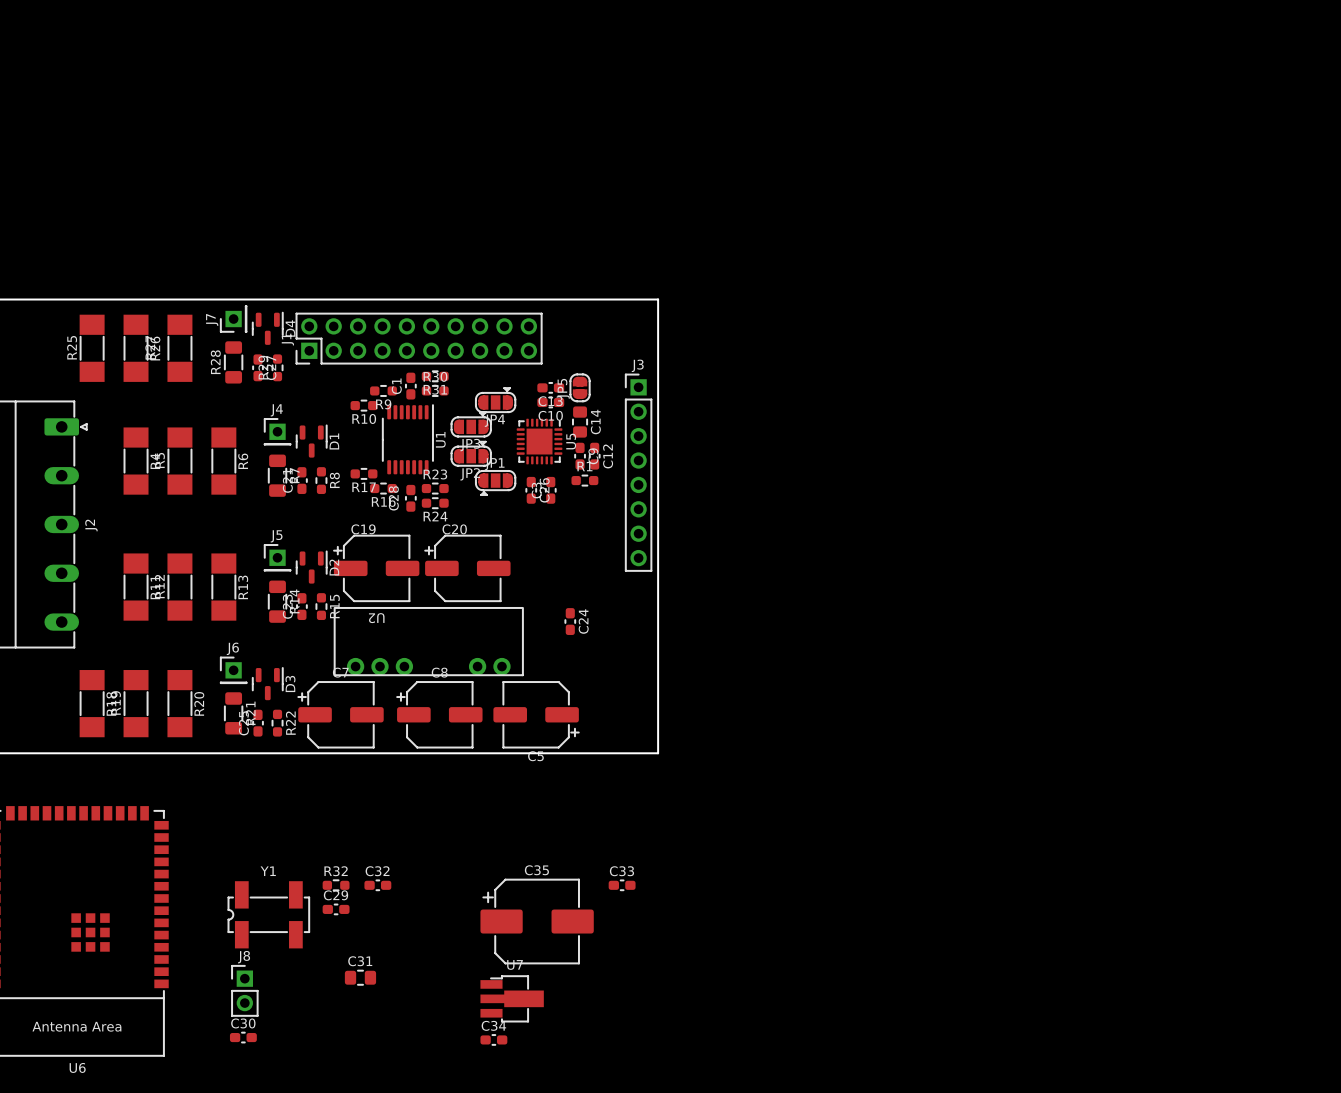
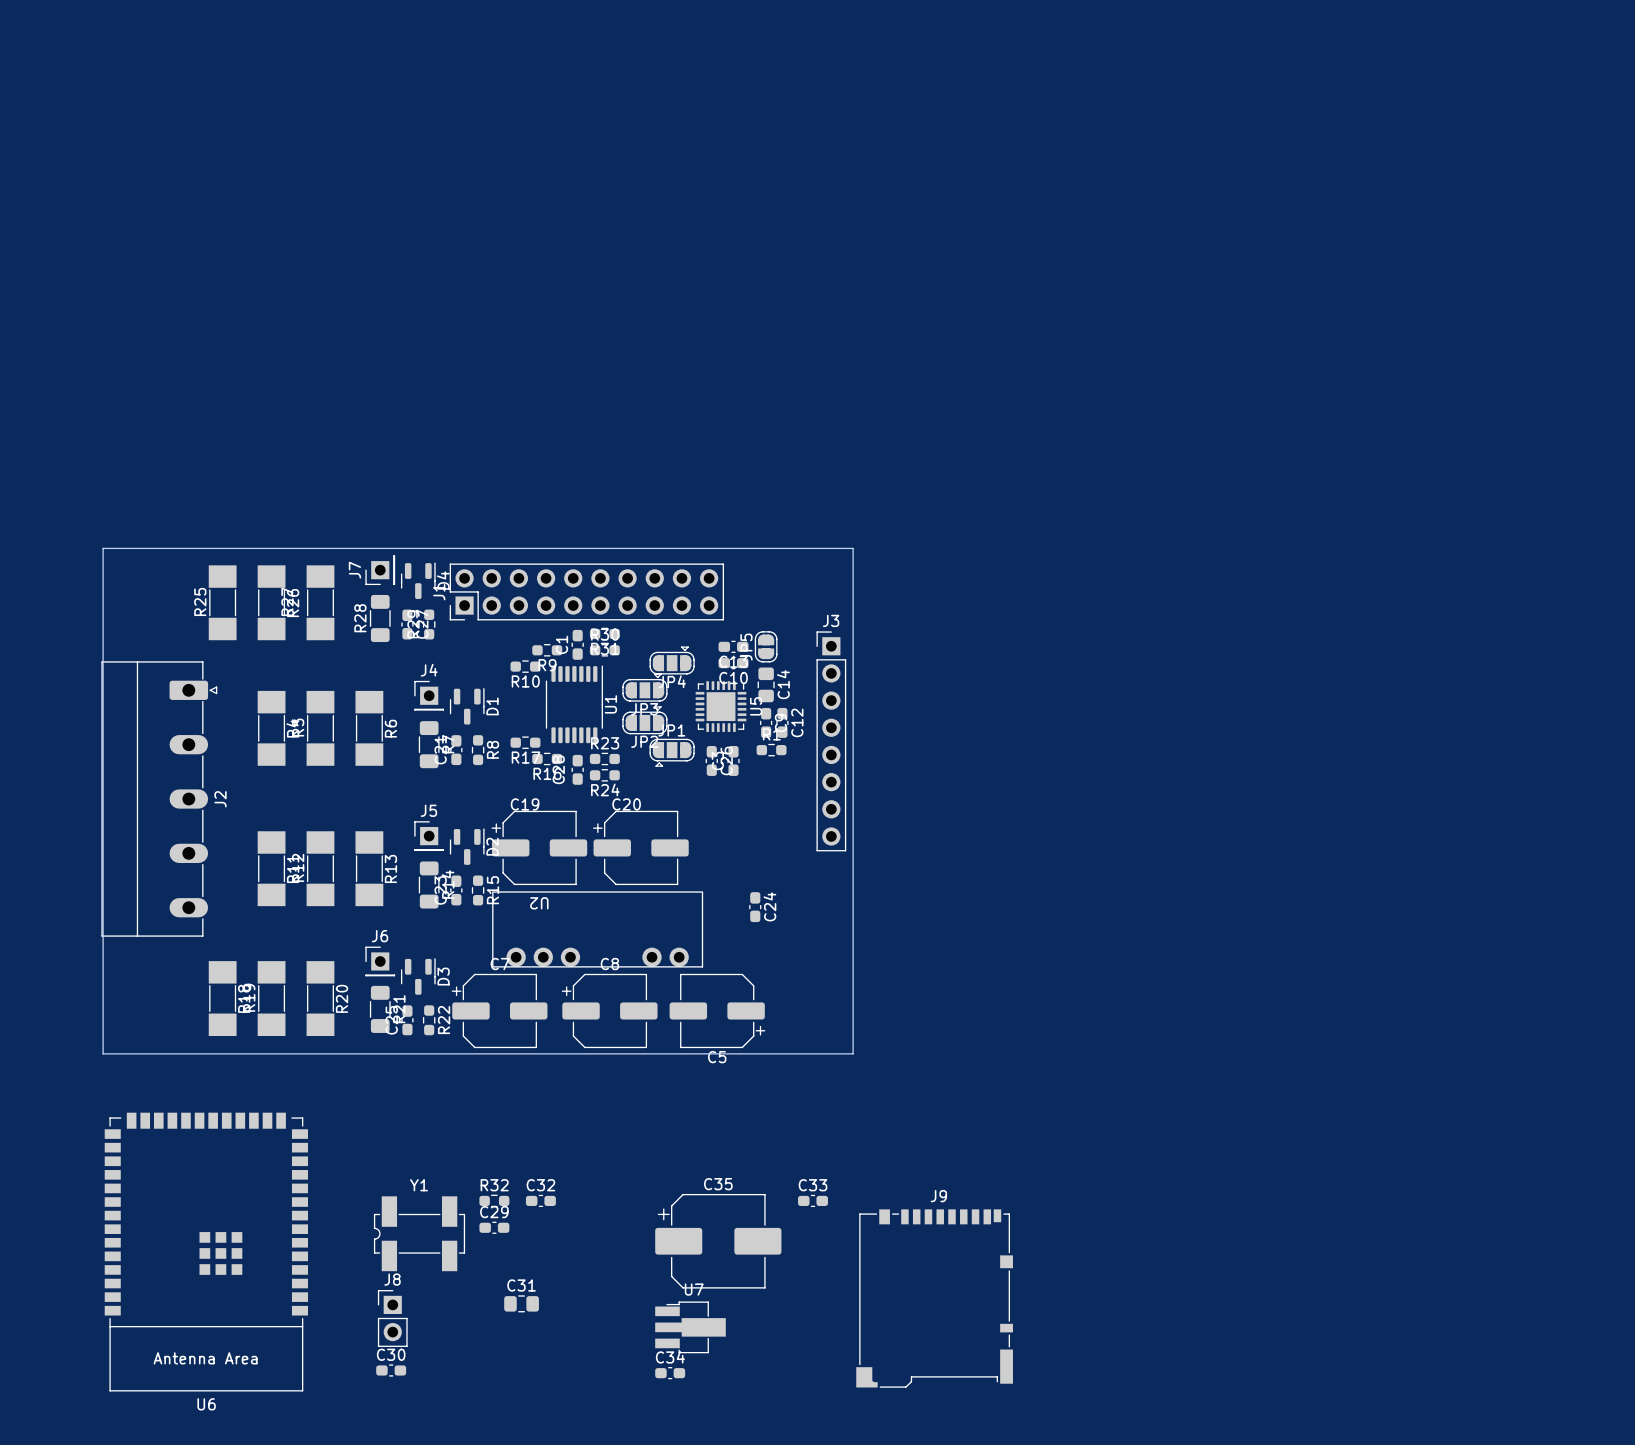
J9: none -> (934, 1298)

